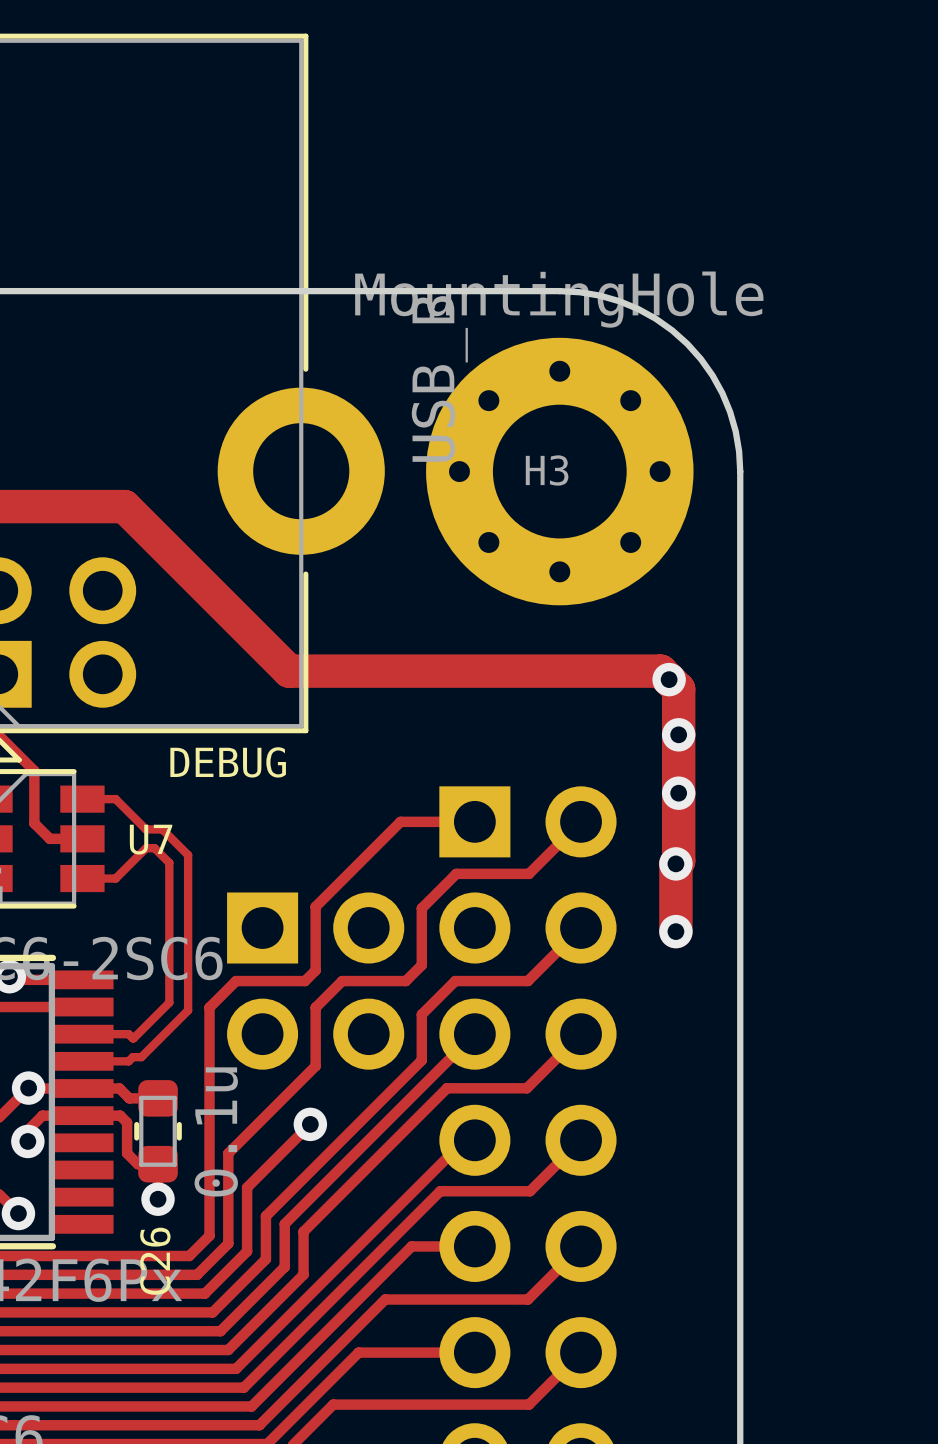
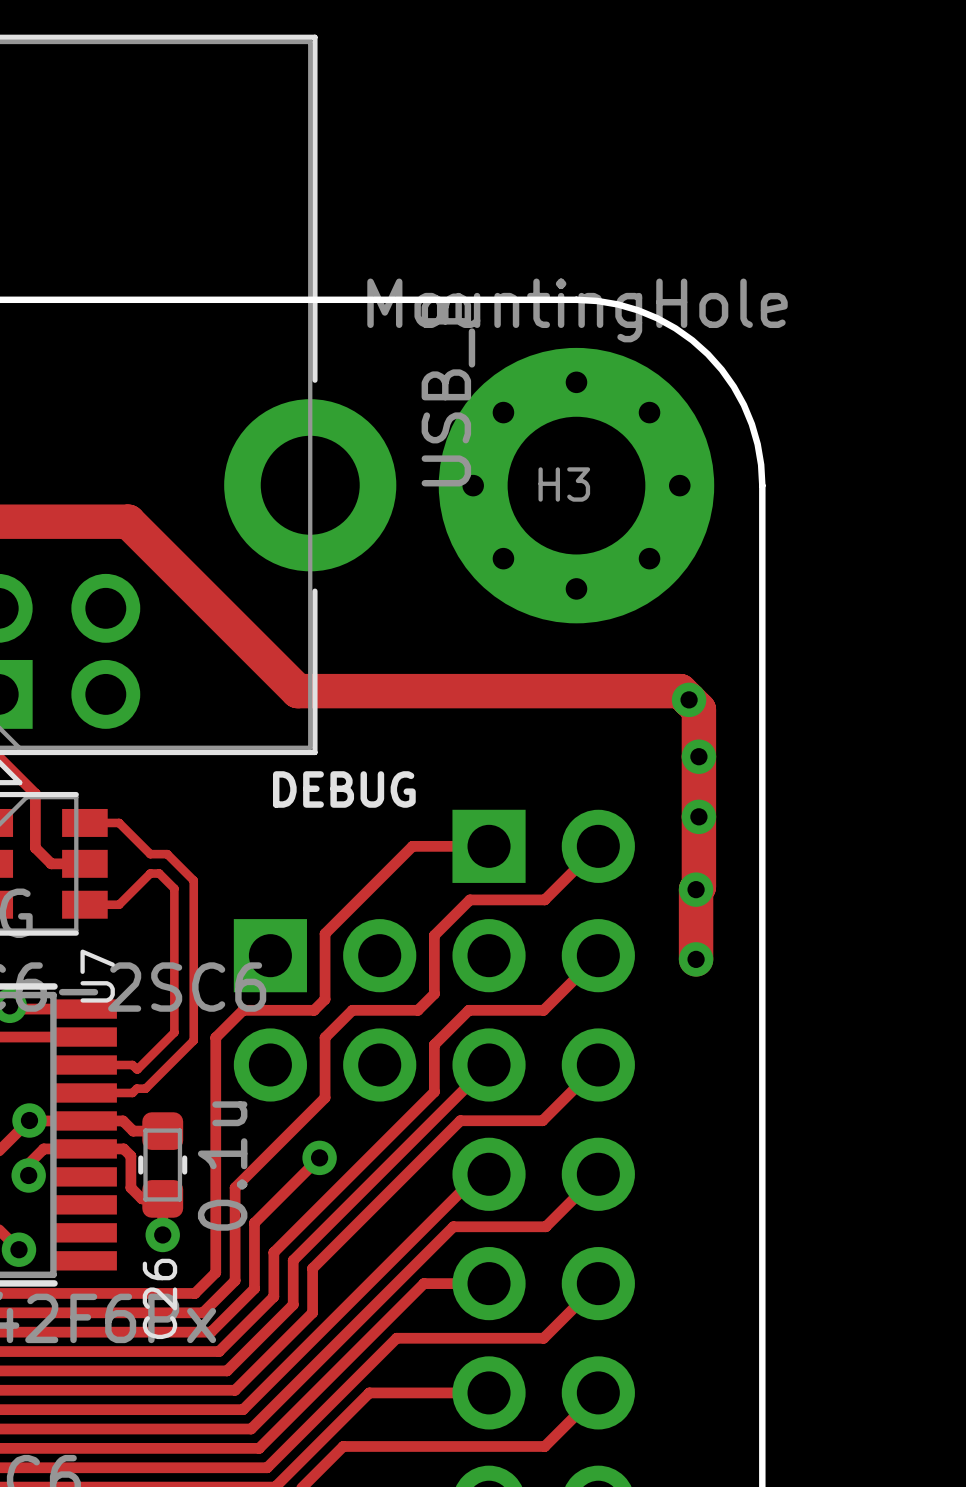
text position: DEBUG (228, 762) -> DEBUG (344, 789)
U7 name rotation: 0° (151, 839) -> 90° counterclockwise (97, 976)
U7 name position: U7 (151, 839) -> U7 (97, 976)

